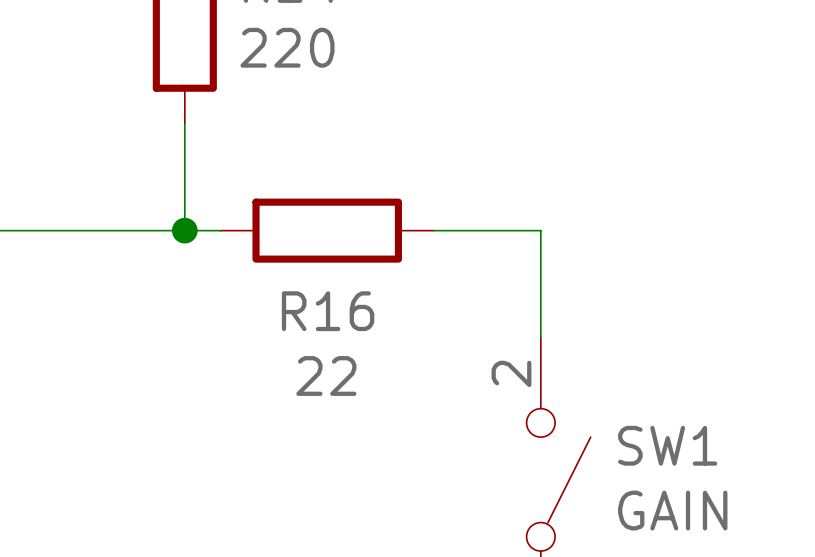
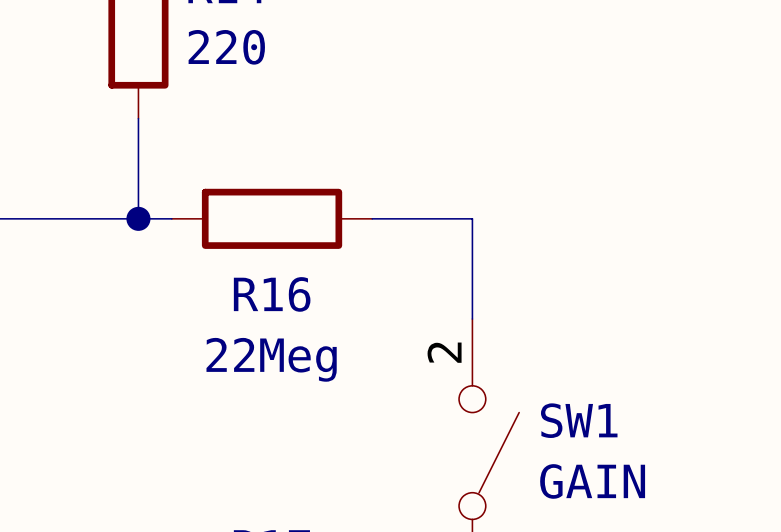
R16 value: 22 (326, 375) -> 22Meg (271, 359)

